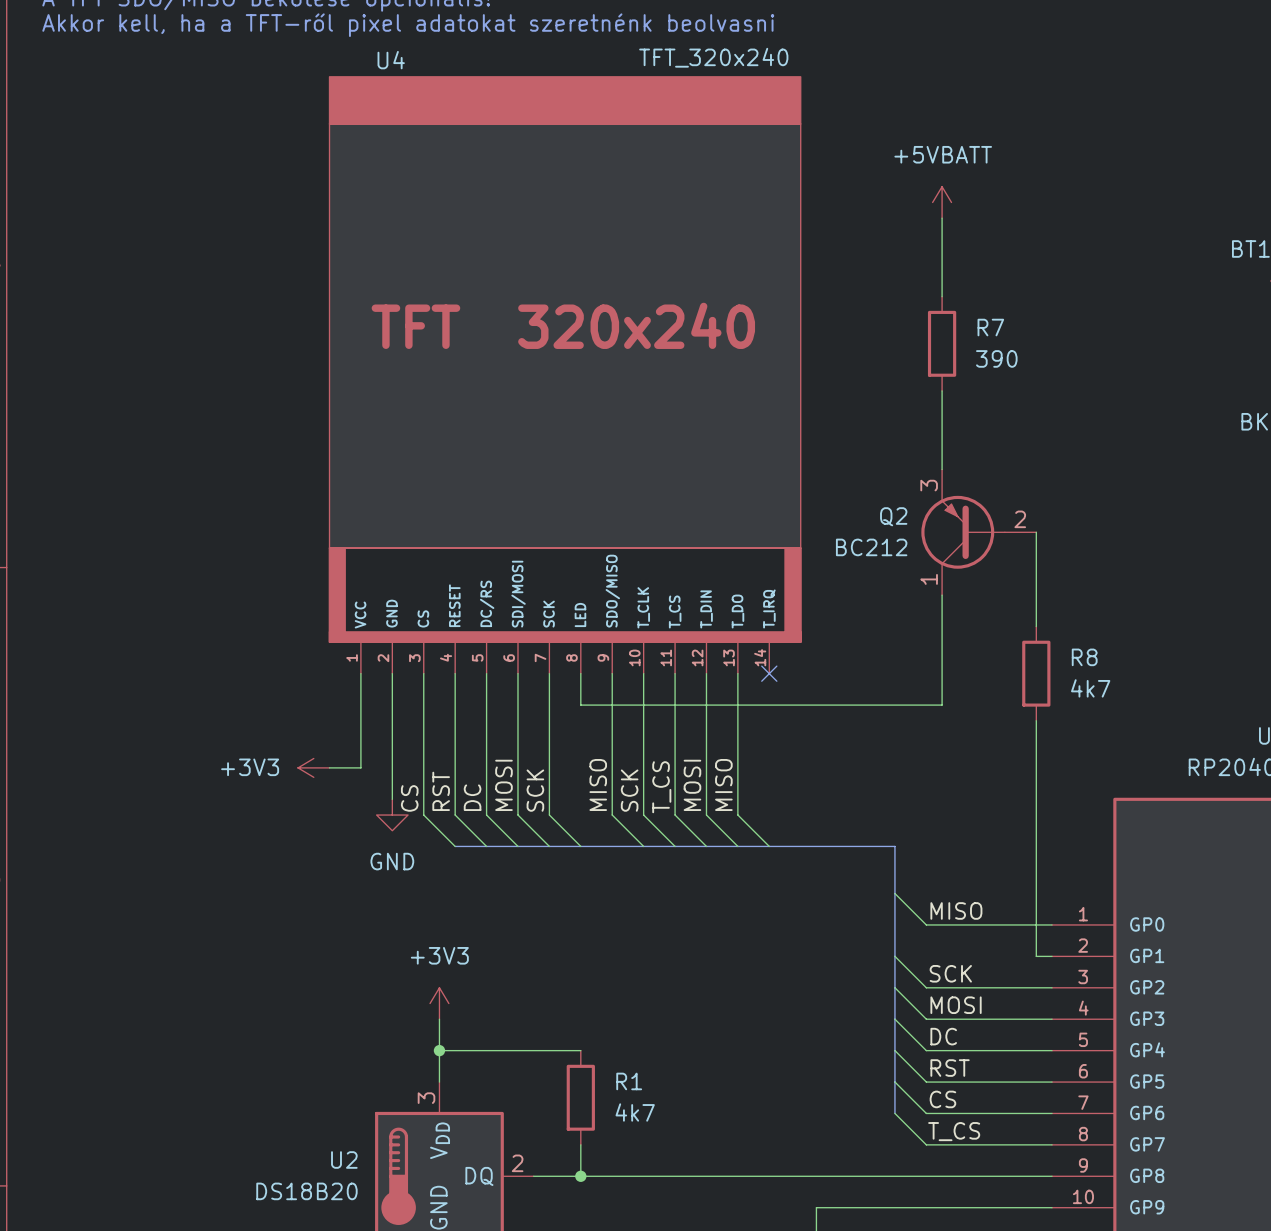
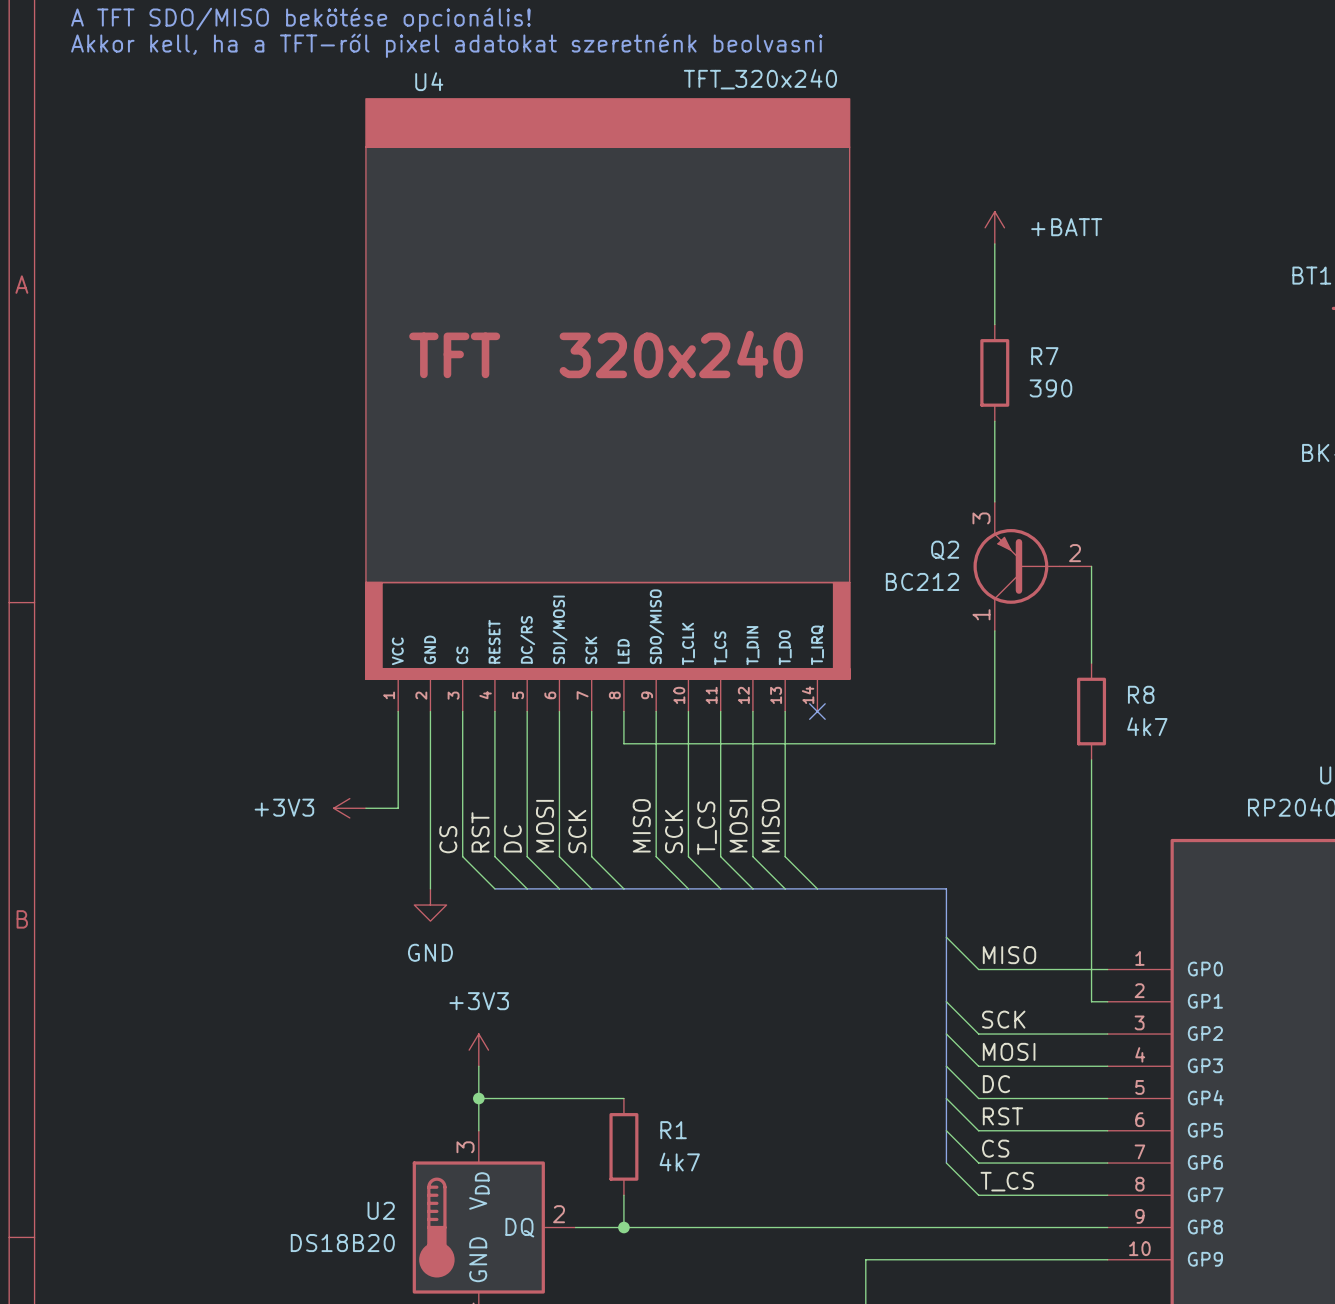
power symbol: +5VBATT (942, 202) -> +BATT (994, 227)
wire: none -> (430, 840) (430, 888)
power symbol position: GND (392, 815) -> GND (430, 905)

